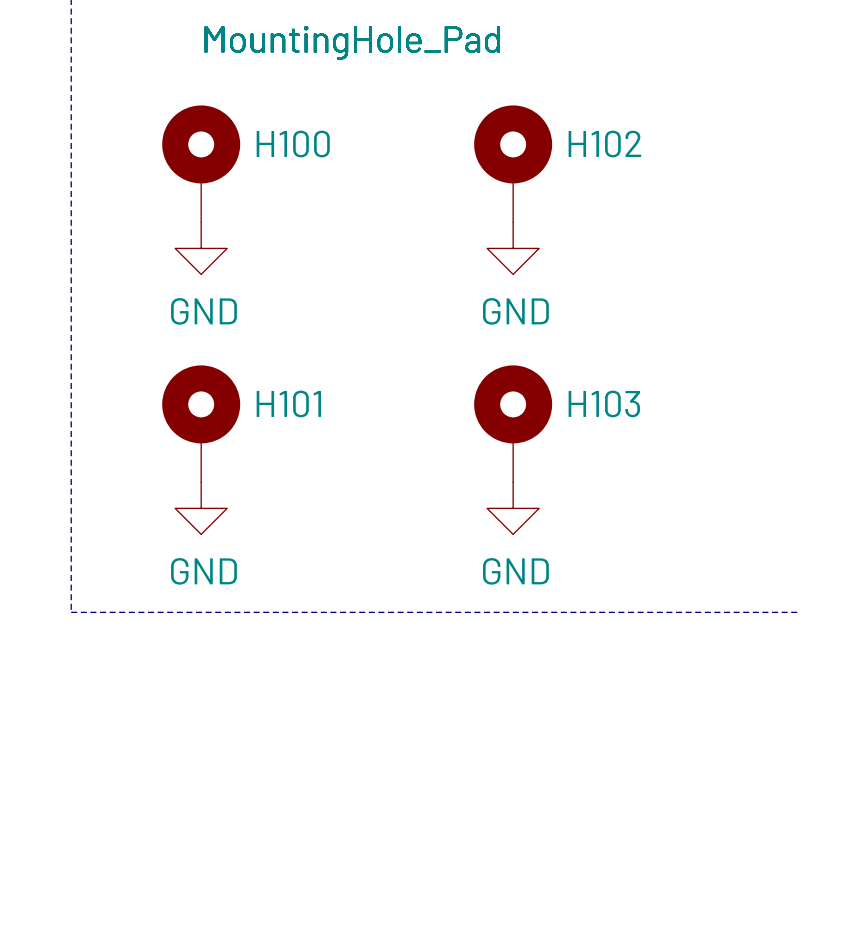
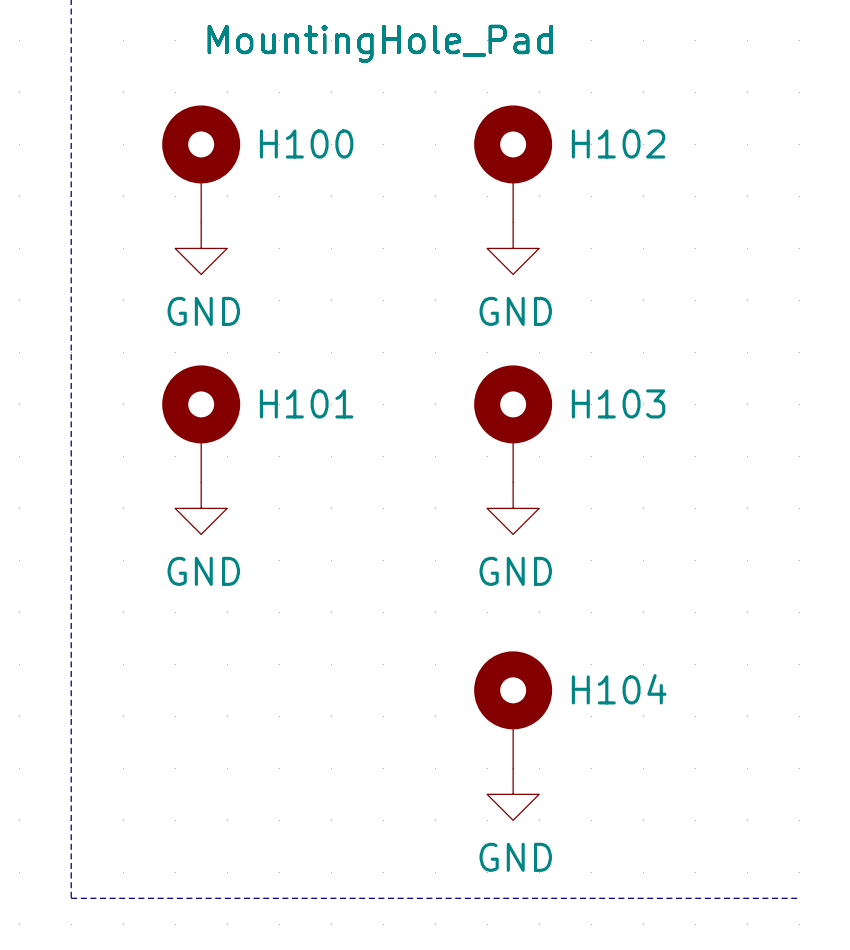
line: (71, 612) (799, 612) -> (71, 612) (71, 898) (799, 898)
H104: none -> MountingHole_Pad (513, 709)
power symbol: none -> GND (513, 794)

